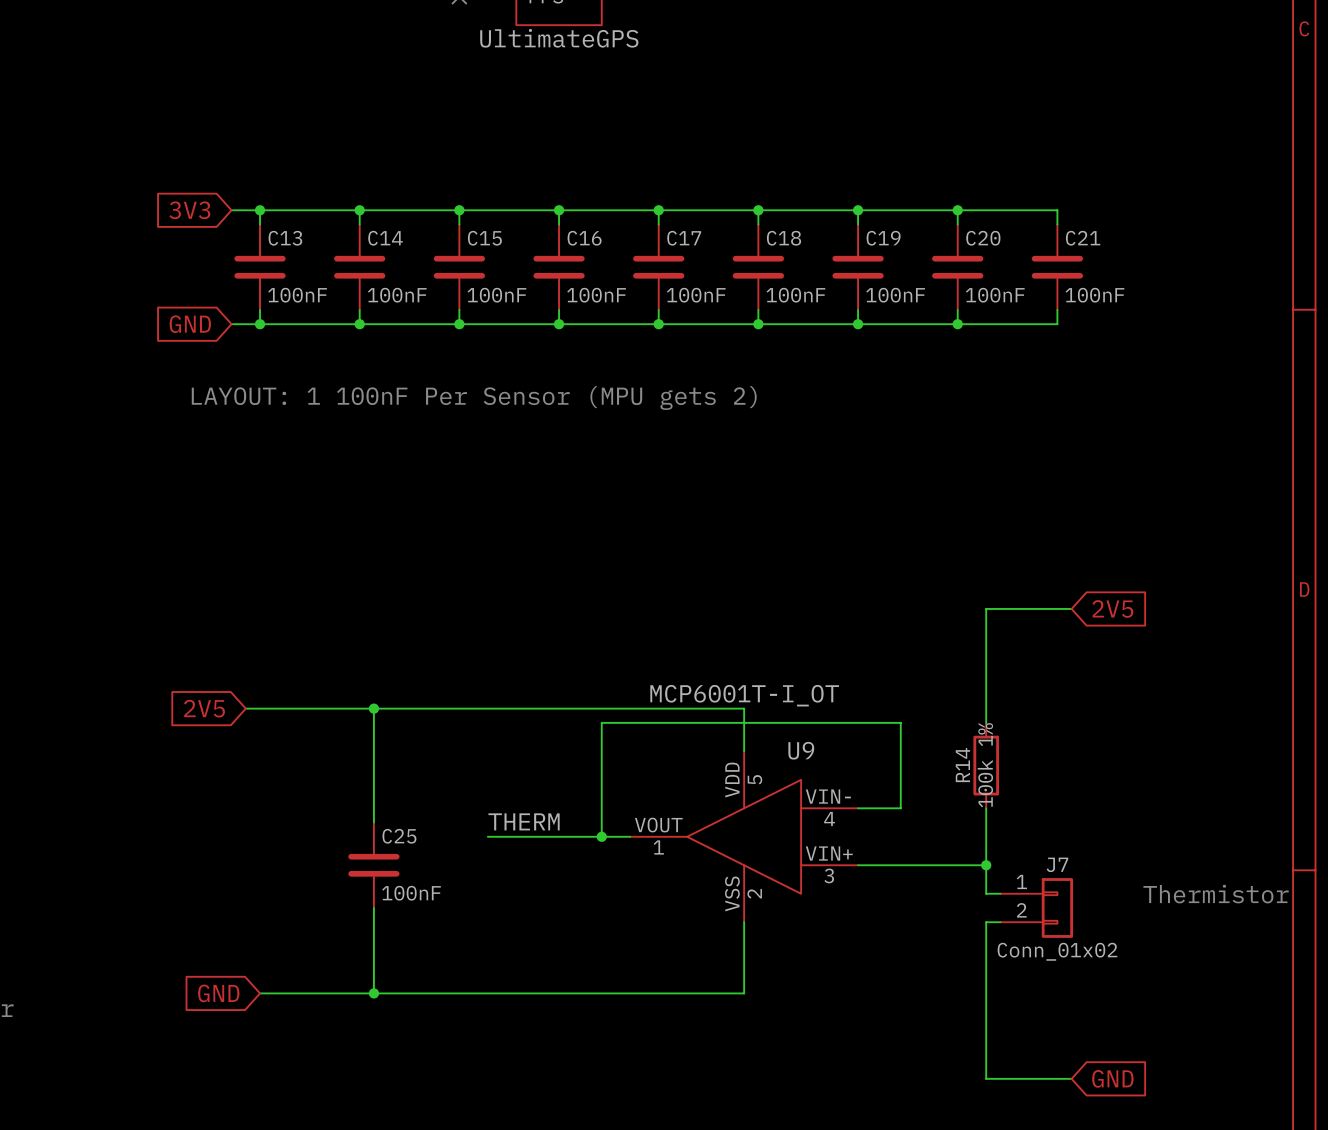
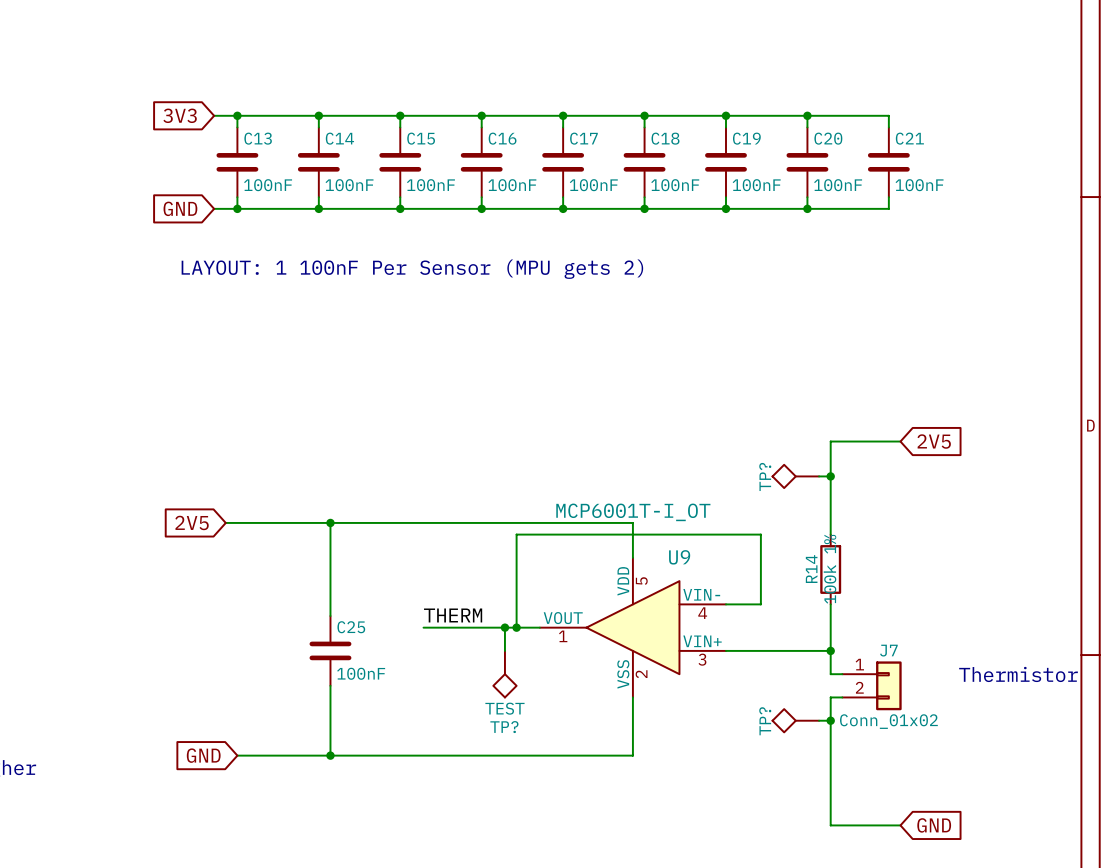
TP?: none -> (795, 476)
wire: none -> (819, 476) (830, 476)
junction: none -> (830, 476)
wire: none -> (504, 627) (504, 650)
junction: none -> (504, 627)
TP?: none -> TEST (504, 674)
TP?: none -> (795, 720)
wire: none -> (819, 720) (830, 720)
junction: none -> (830, 720)

